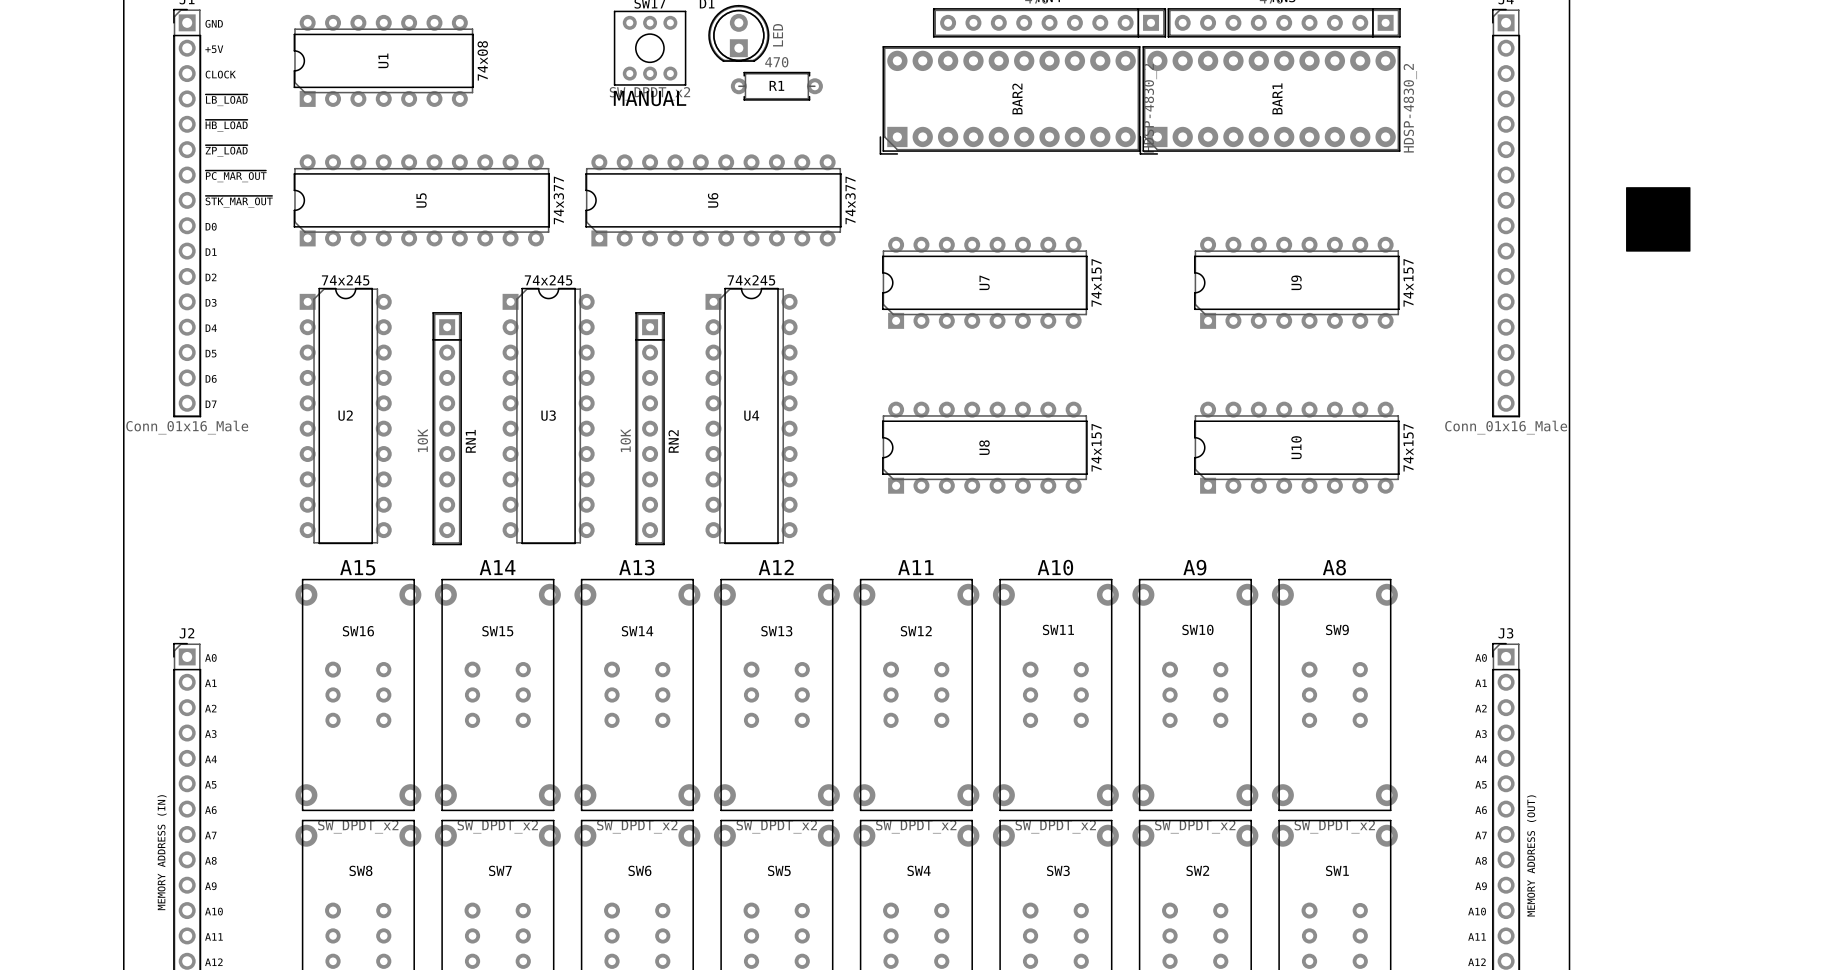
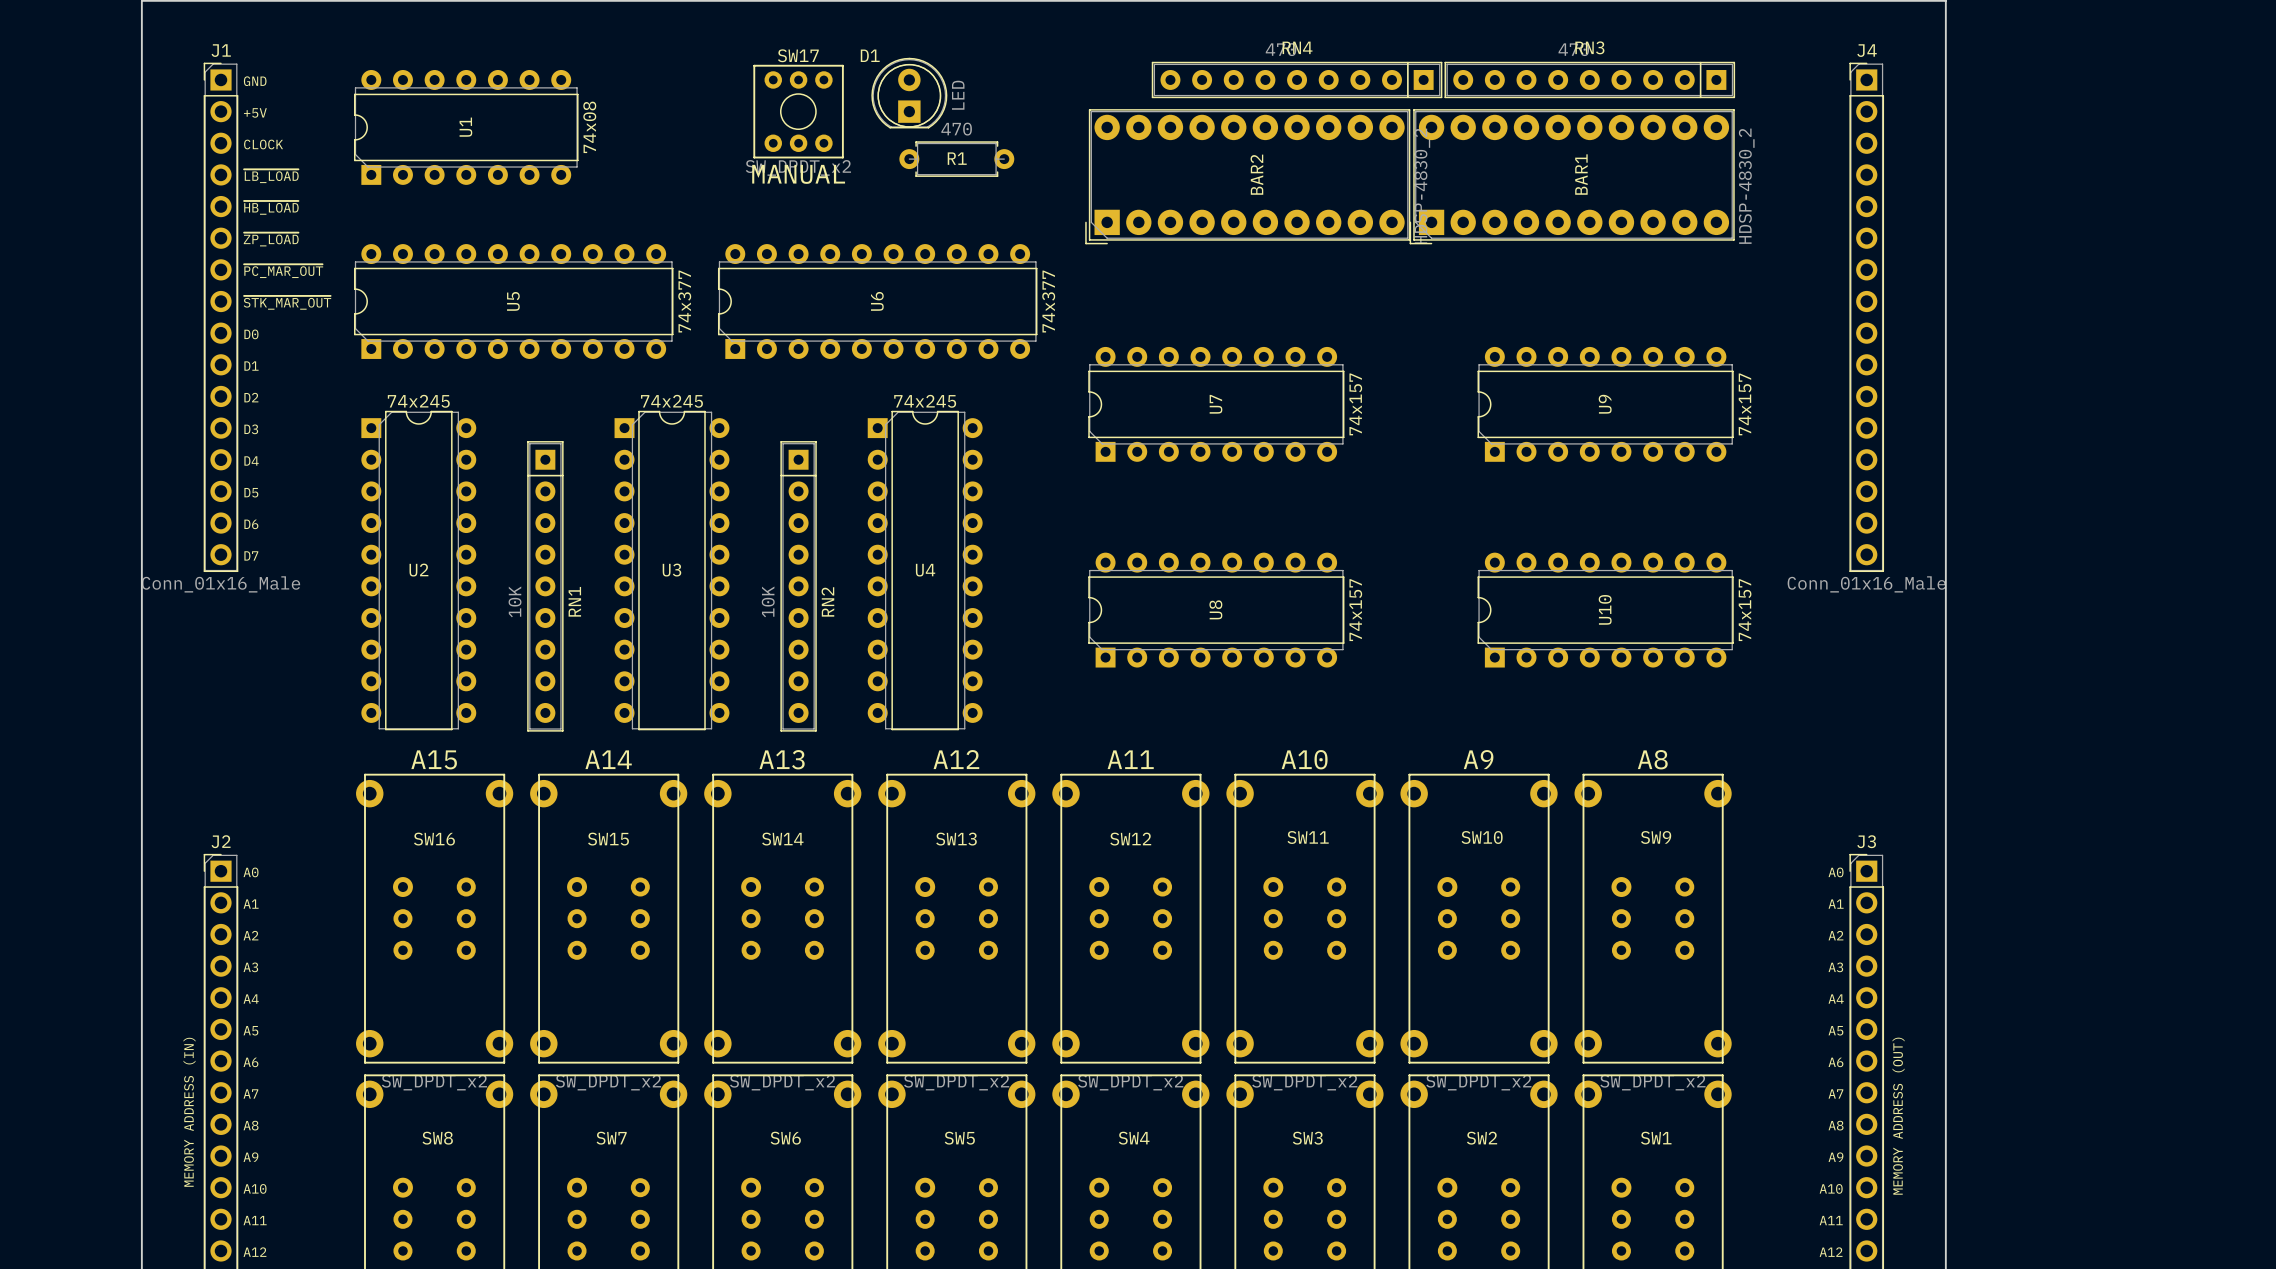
drawing: [1626, 187, 1691, 252] -> none

